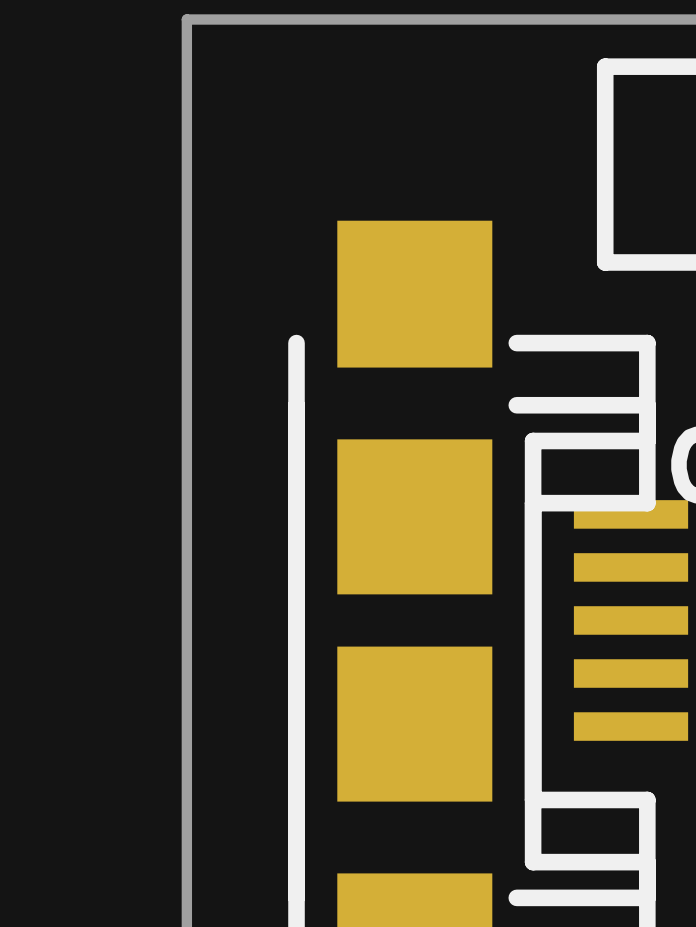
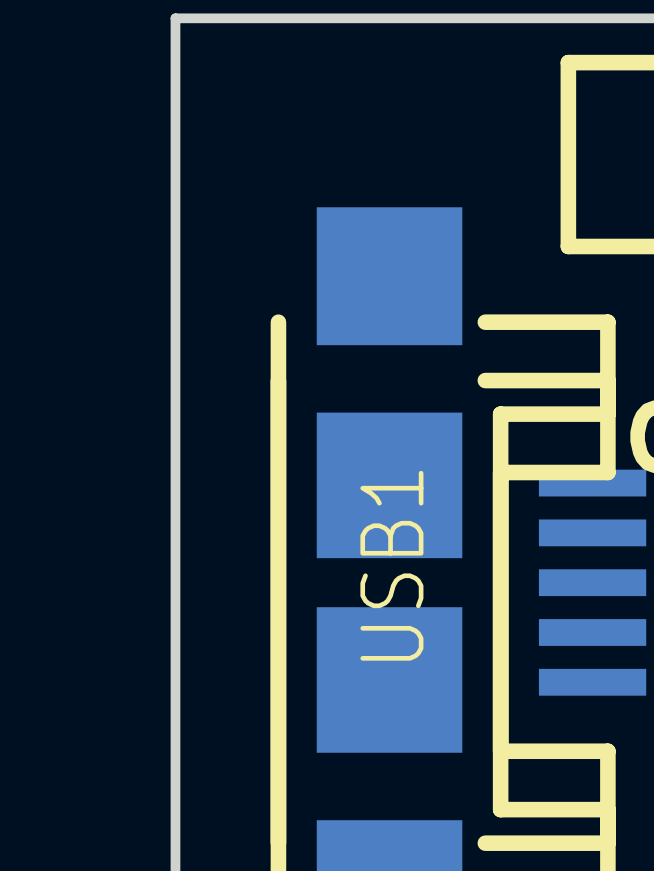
USB1 name: none -> USB1 (391, 565)

